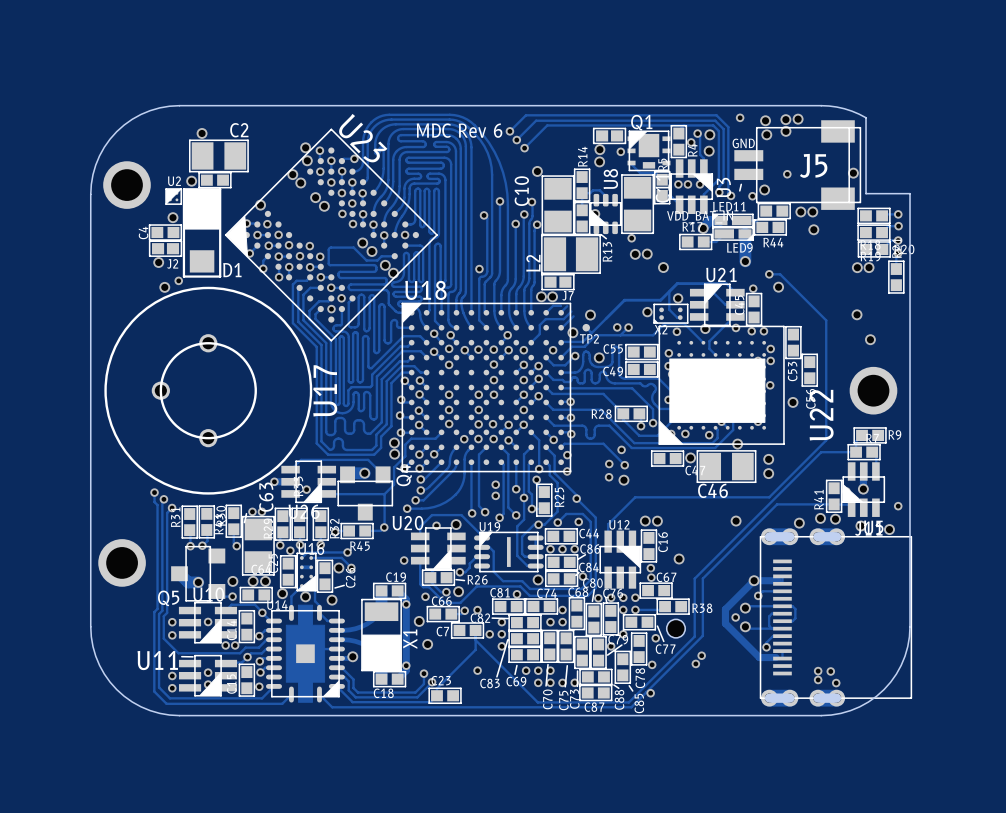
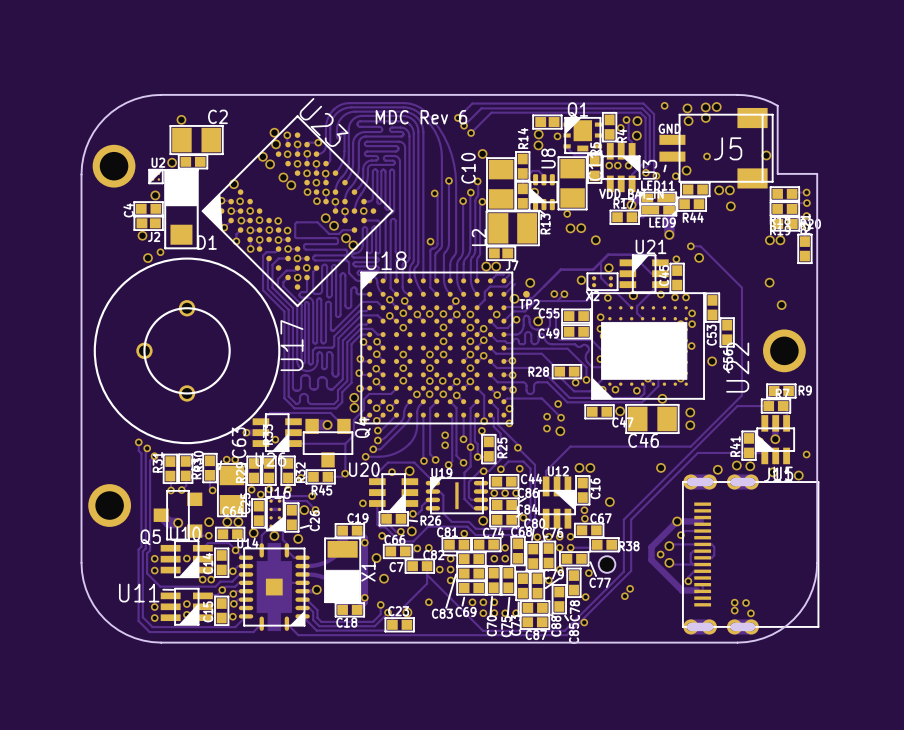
via: none -> (407, 612)

